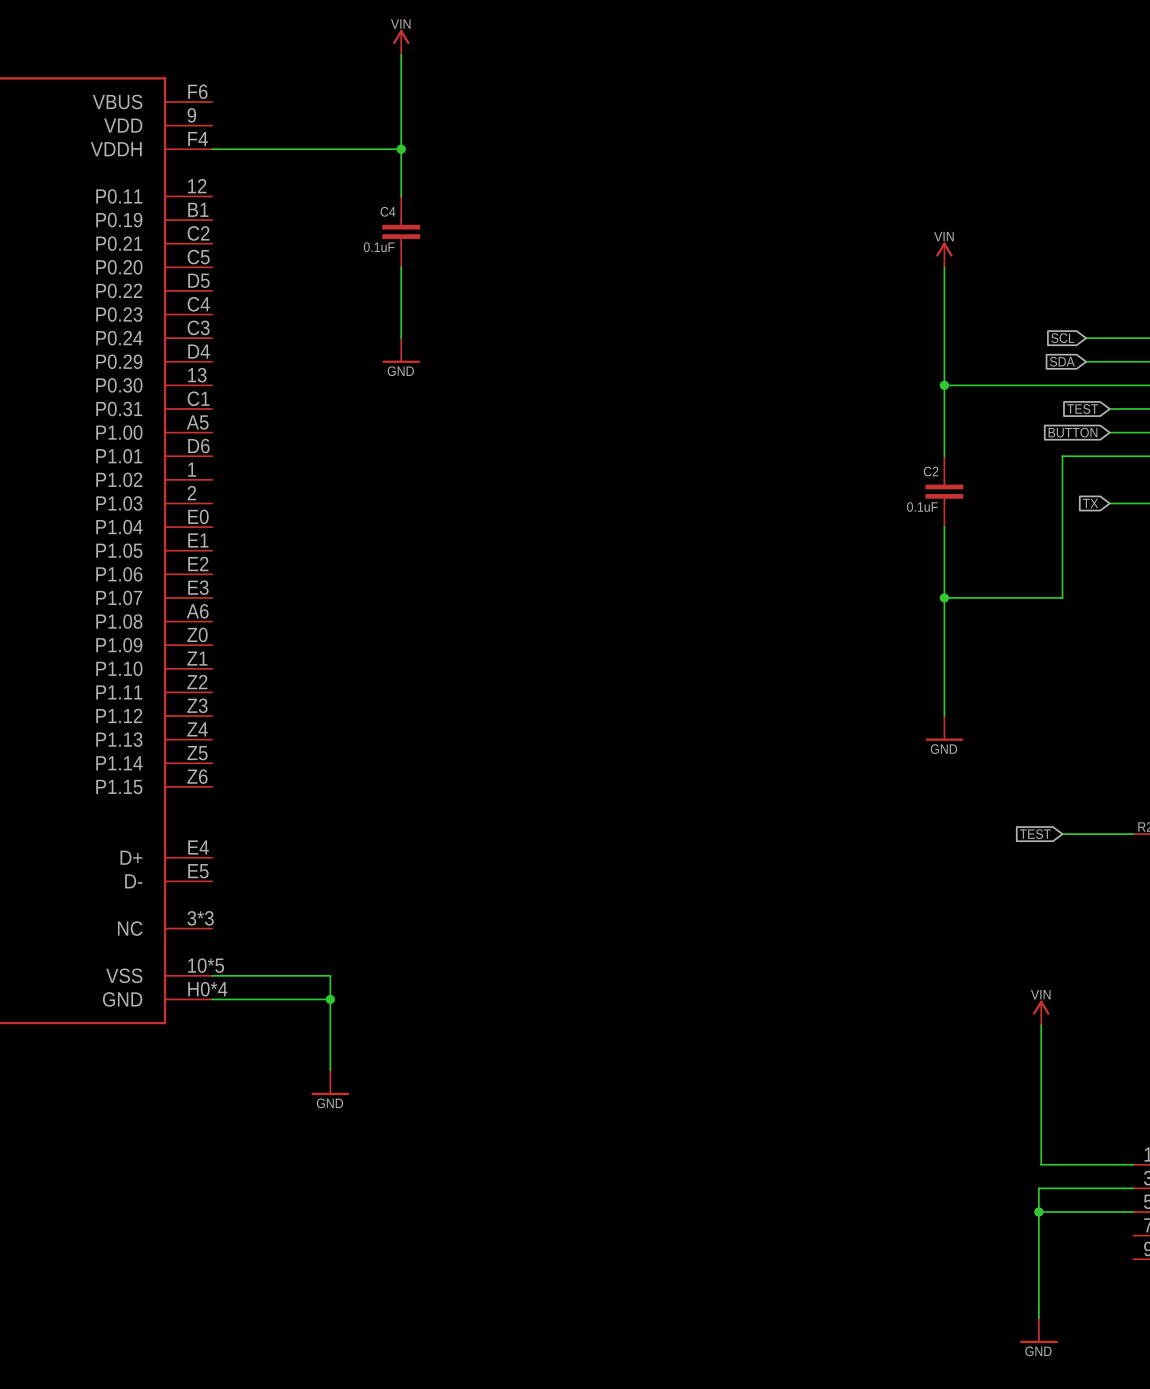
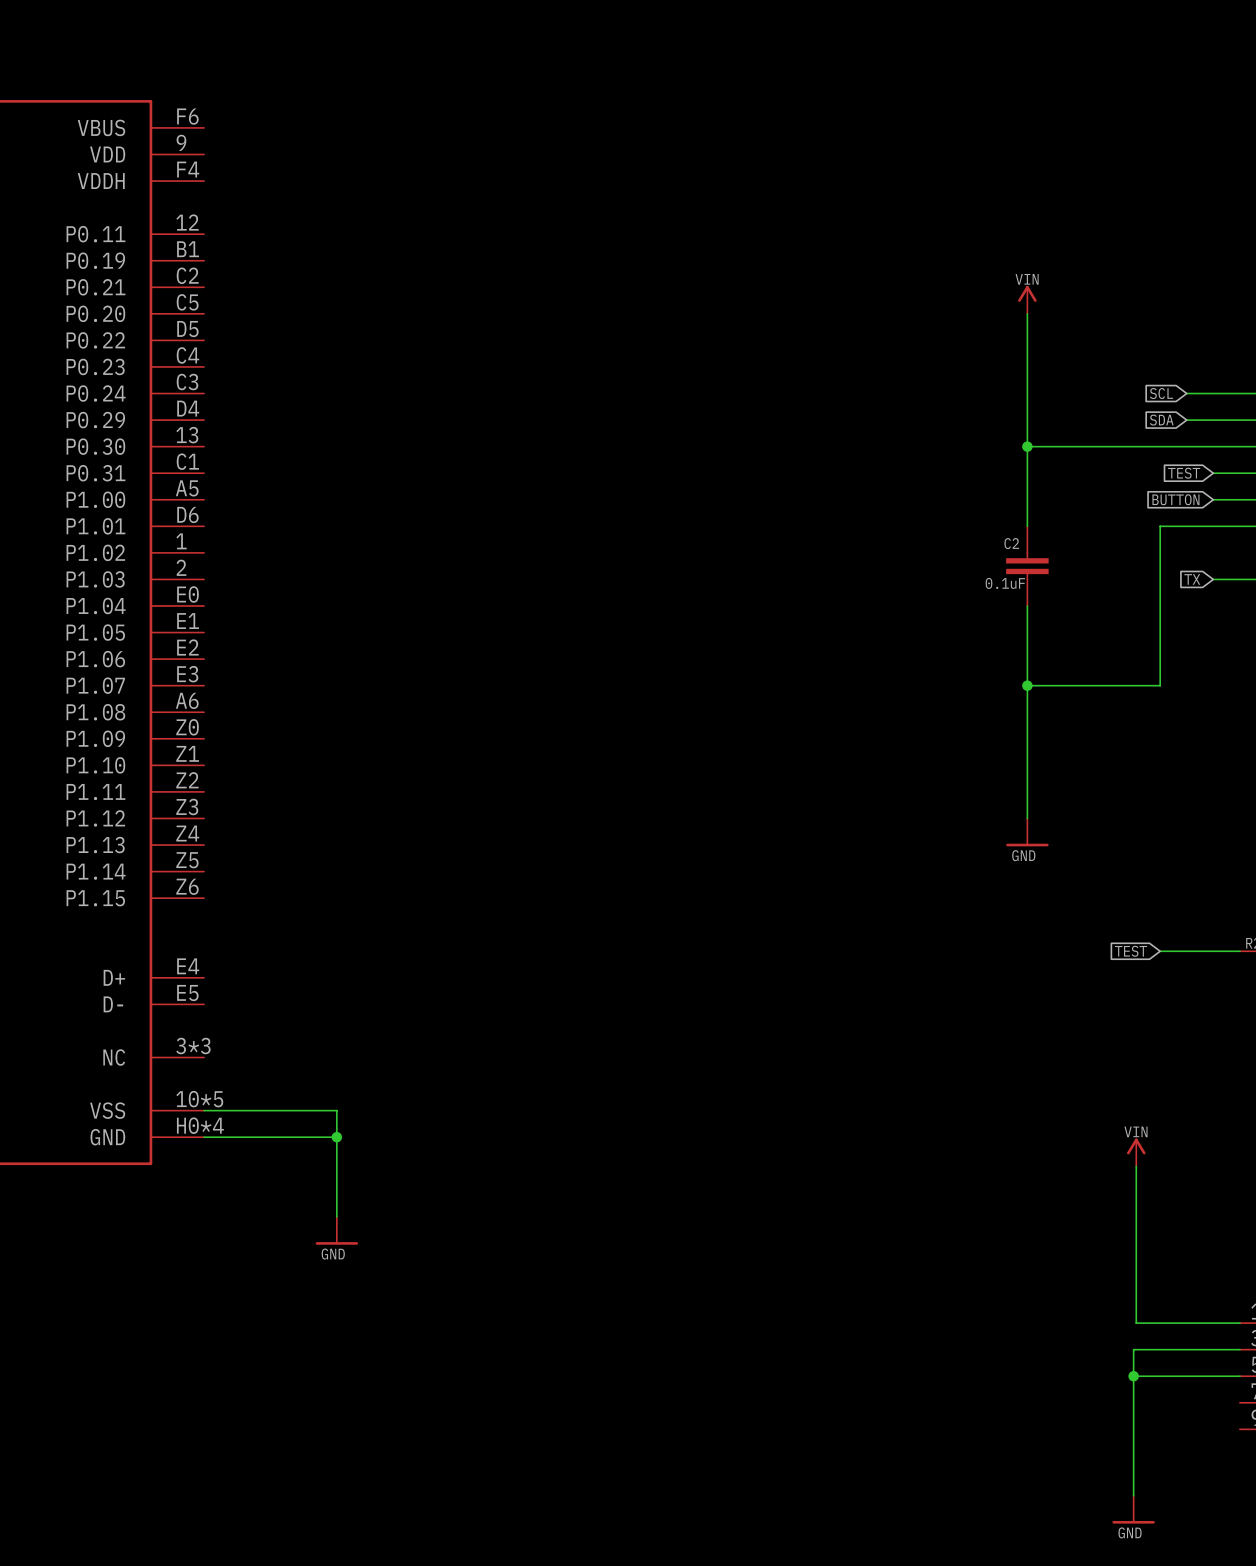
power symbol: VIN (401, 42) -> none
wire: (401, 54) (401, 196) -> none
wire: (212, 149) (401, 149) -> none
junction: (401, 149) -> none
C4: 0.1uF (401, 231) -> none
wire: (401, 267) (401, 338) -> none
power symbol: GND (401, 350) -> none

